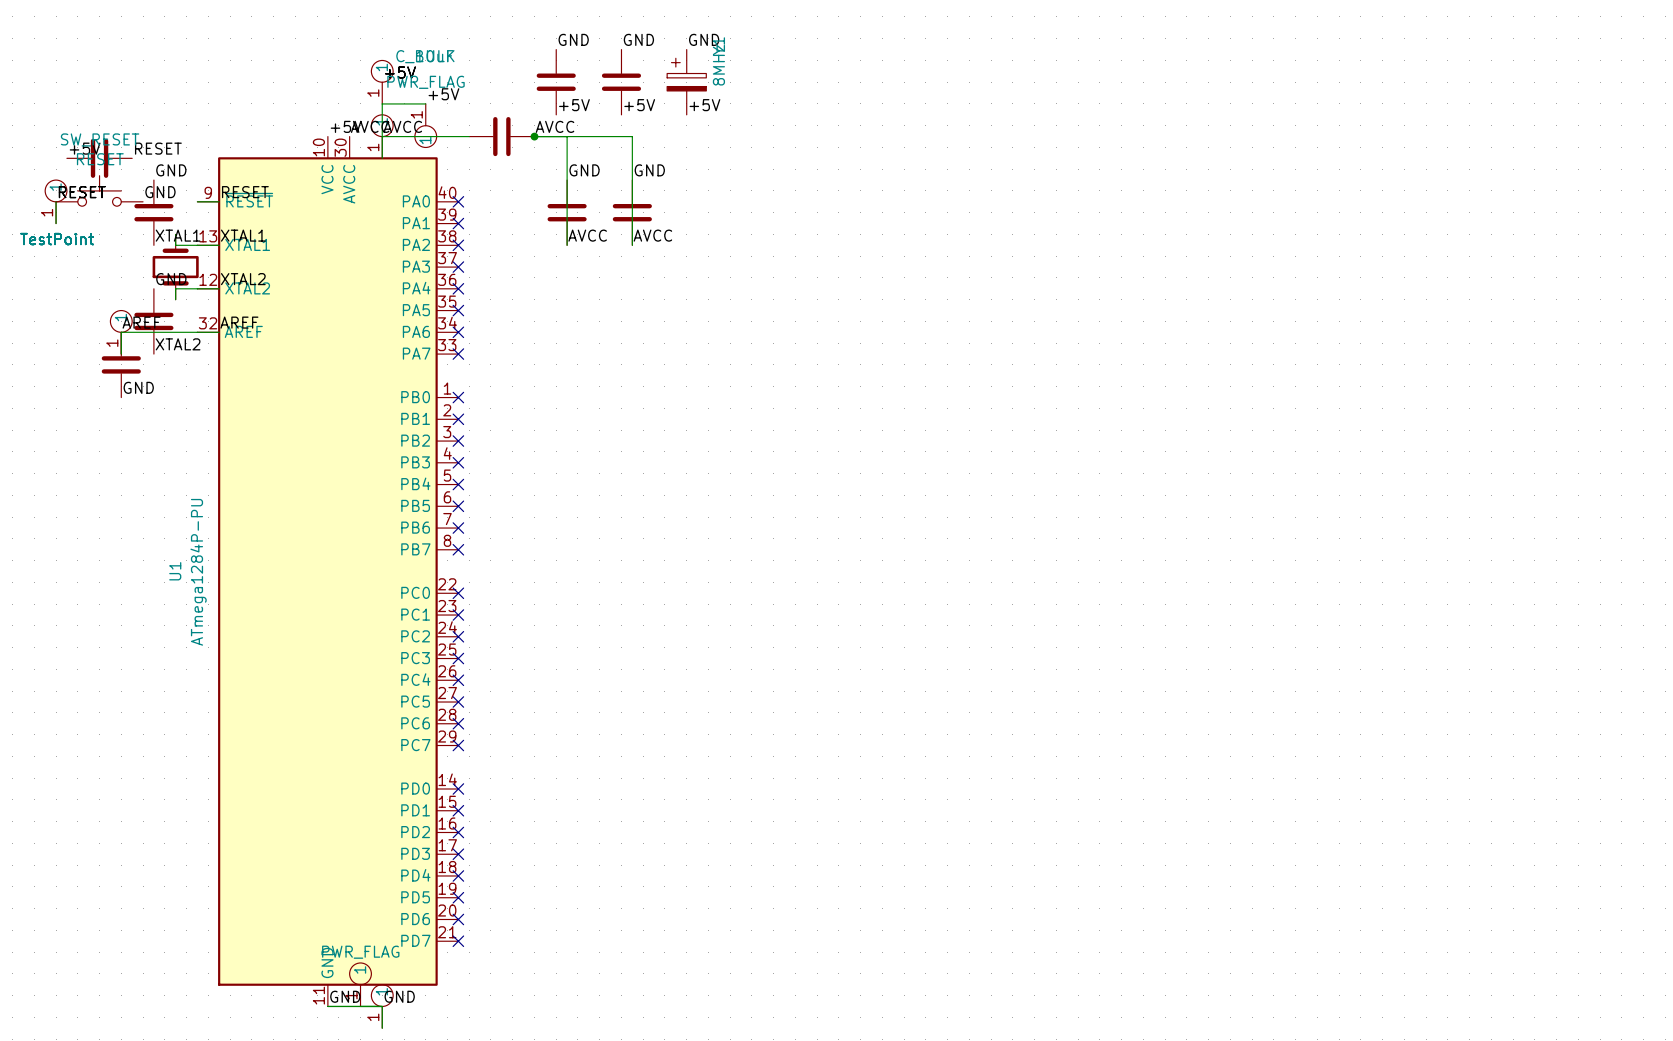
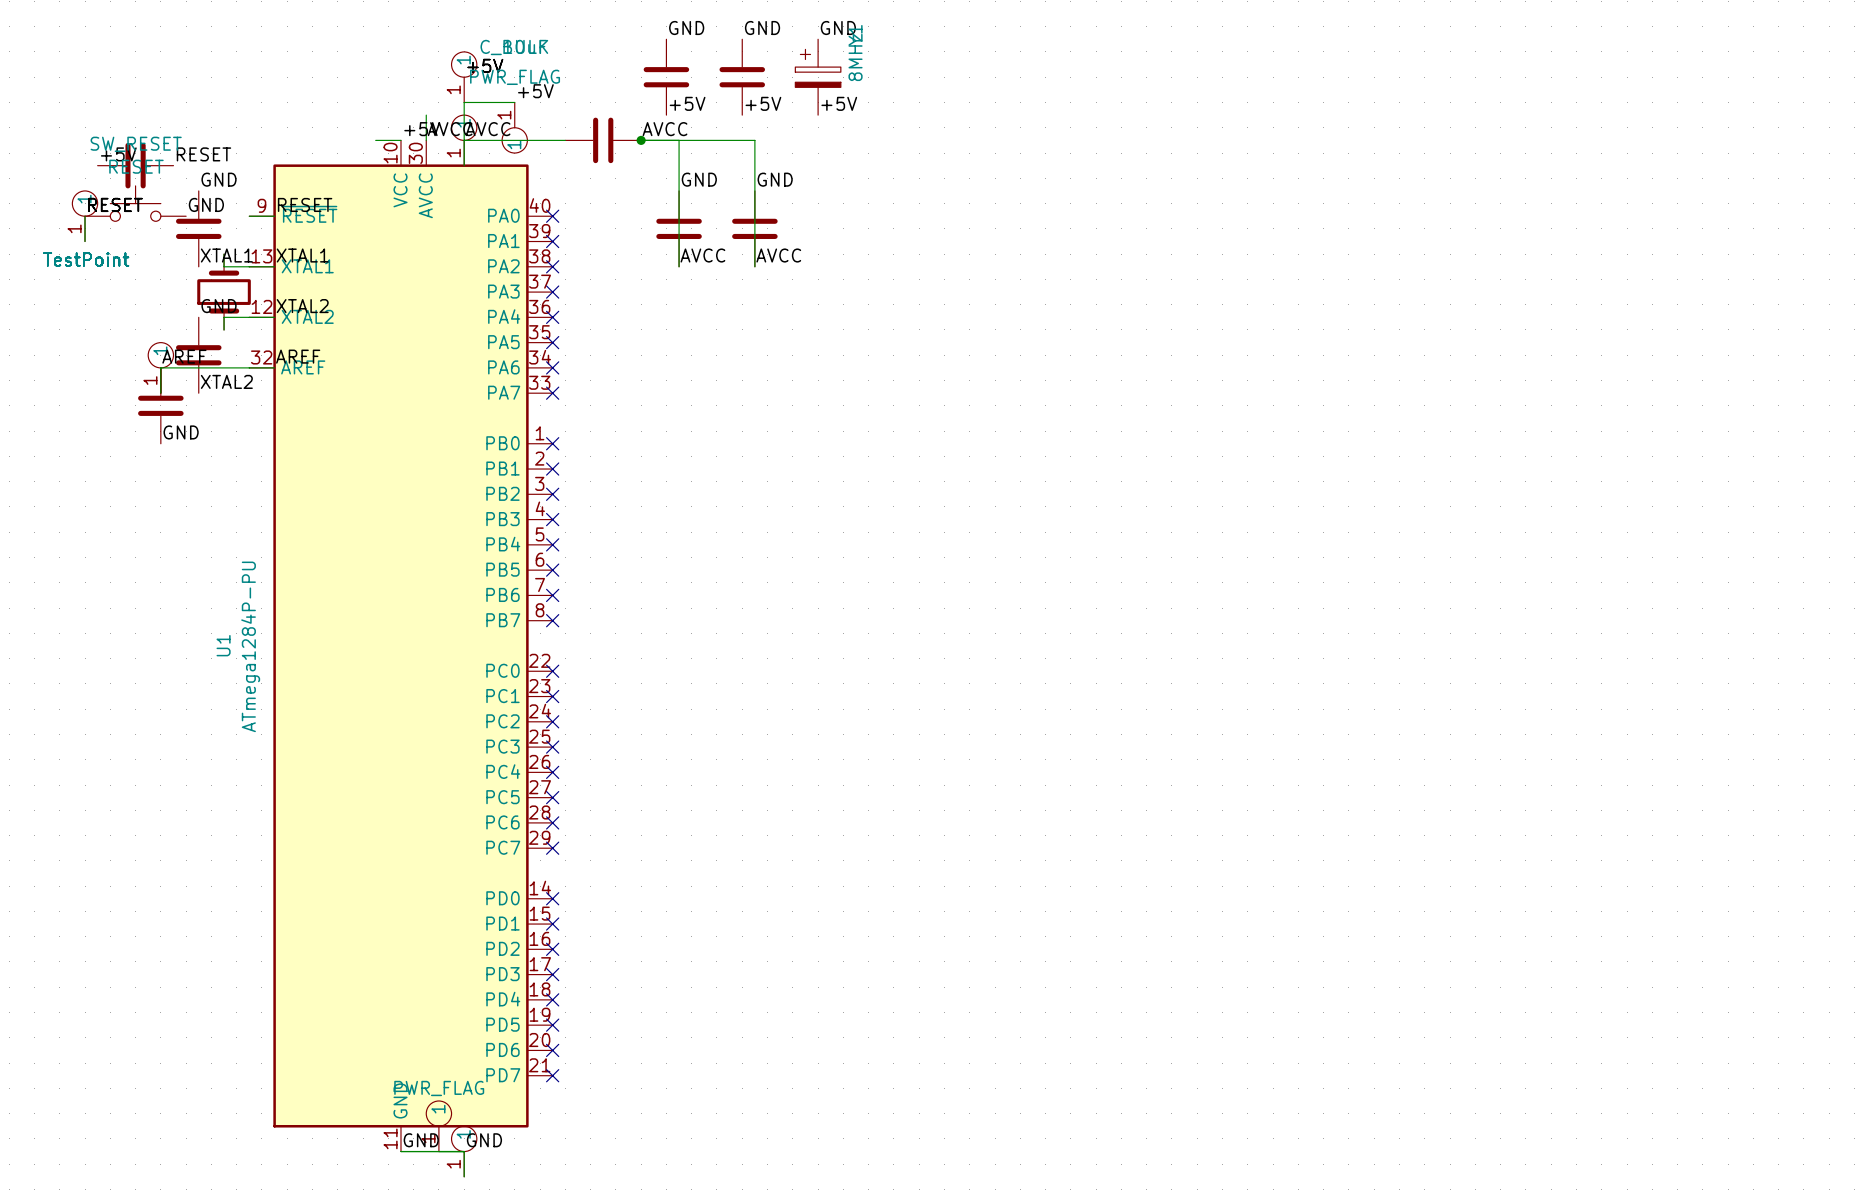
wire: none -> (426, 115) (426, 140)
wire: none -> (375, 140) (400, 140)

